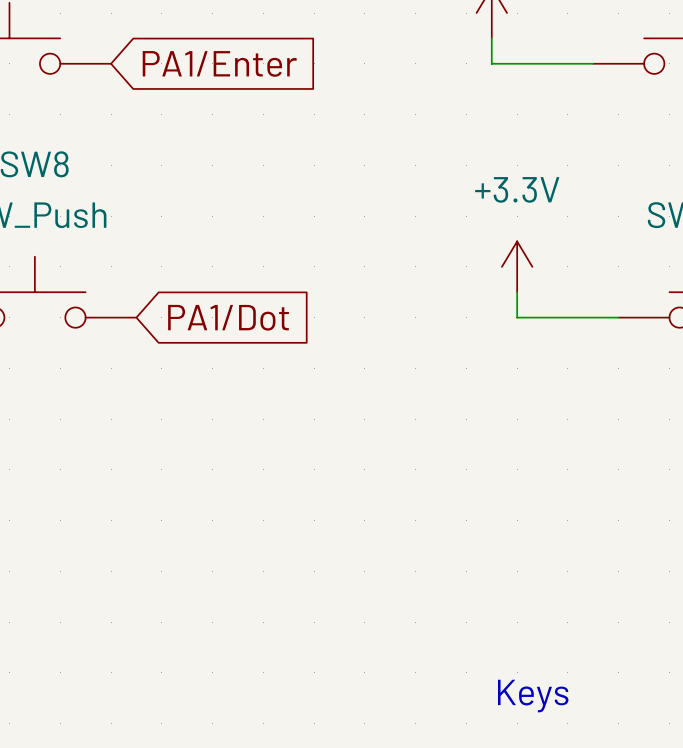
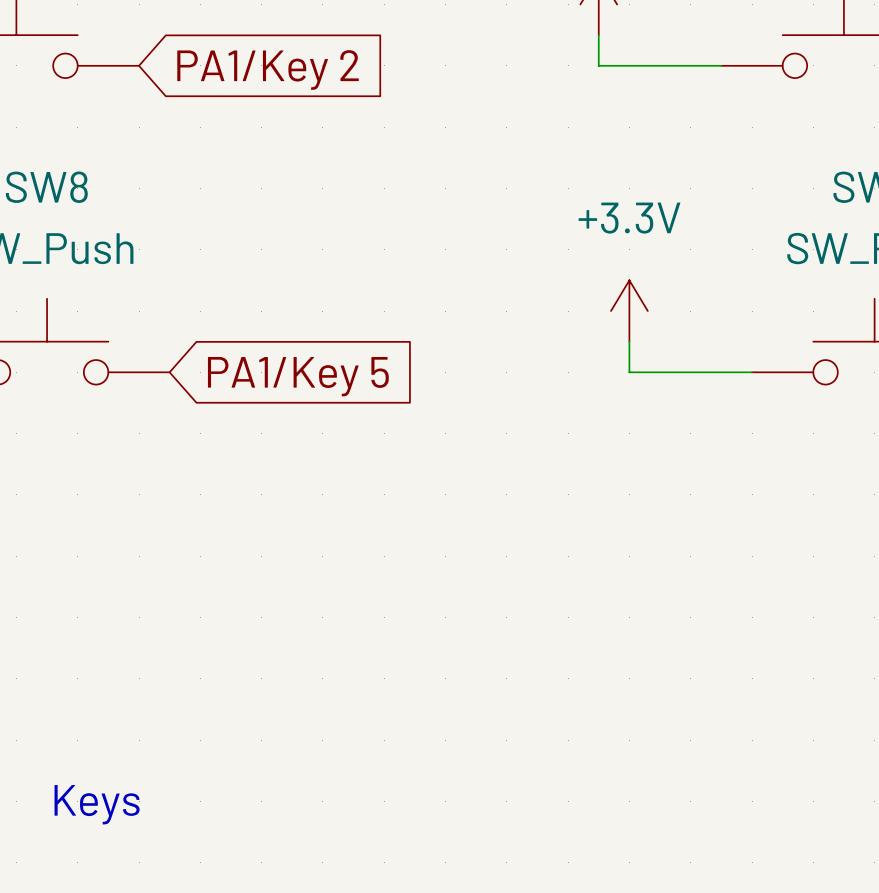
global label: PA1/Enter (219, 63) -> PA1/Key 2 (268, 70)
global label: PA1/Dot (228, 317) -> PA1/Key 5 (298, 376)
text position: Keys (533, 696) -> Keys (97, 804)

